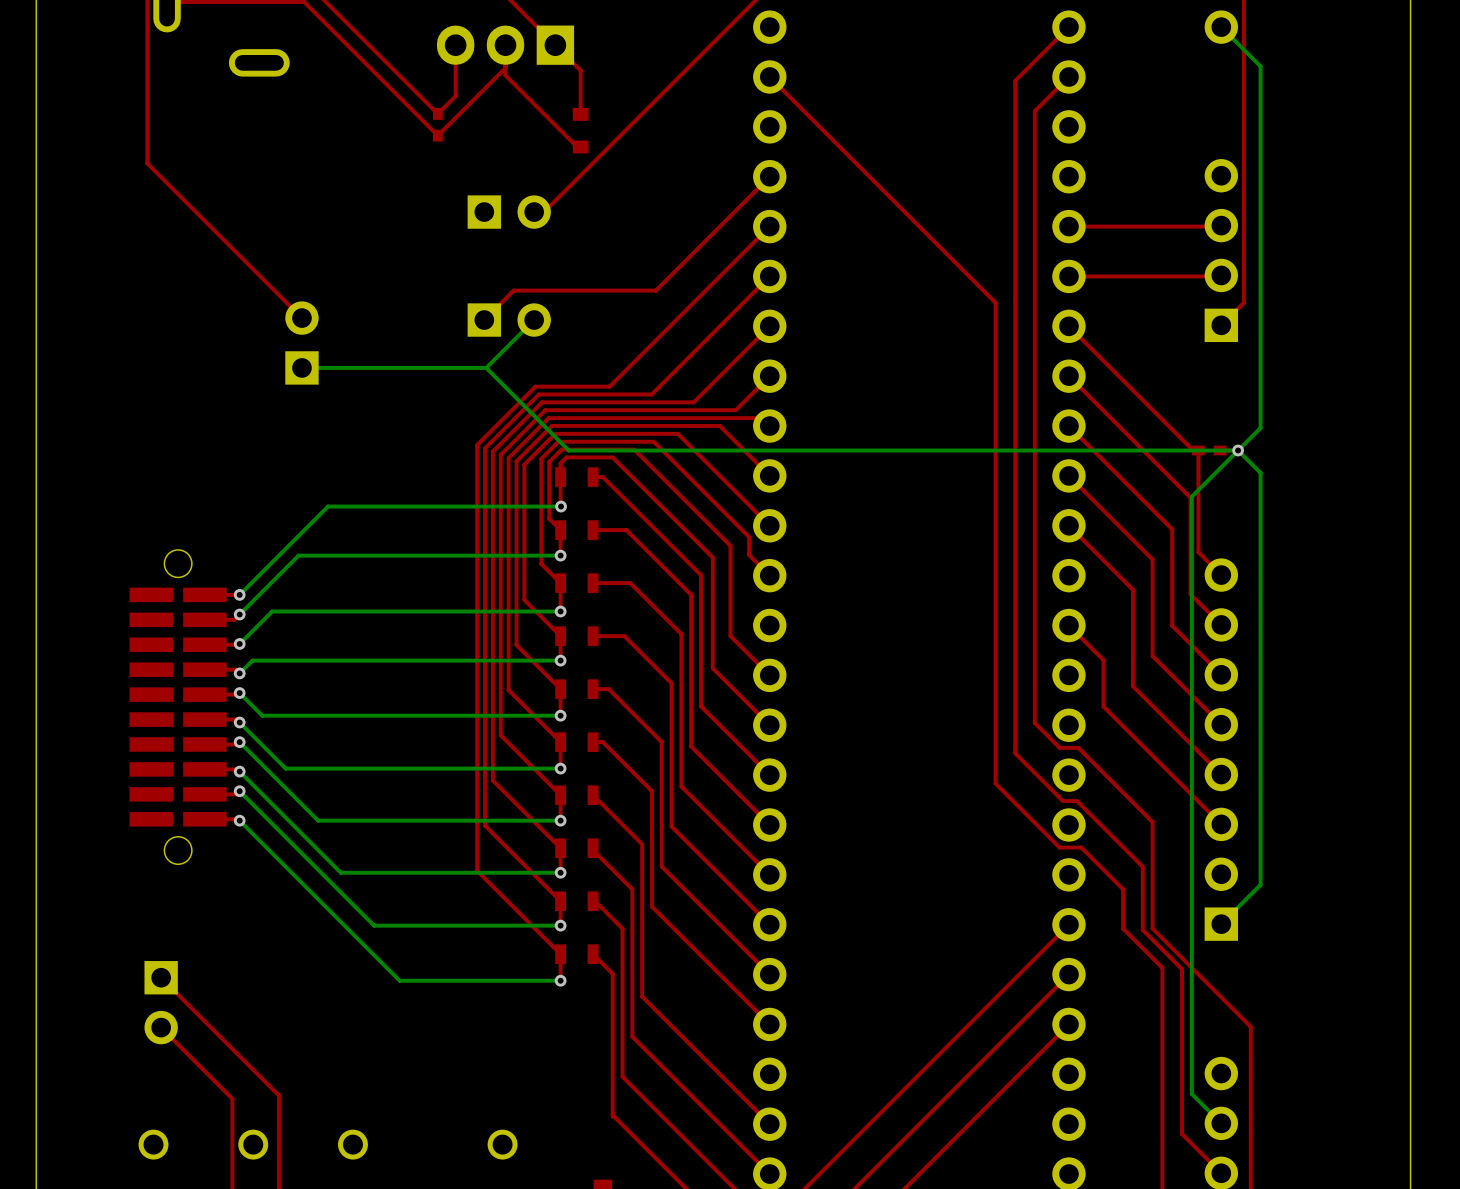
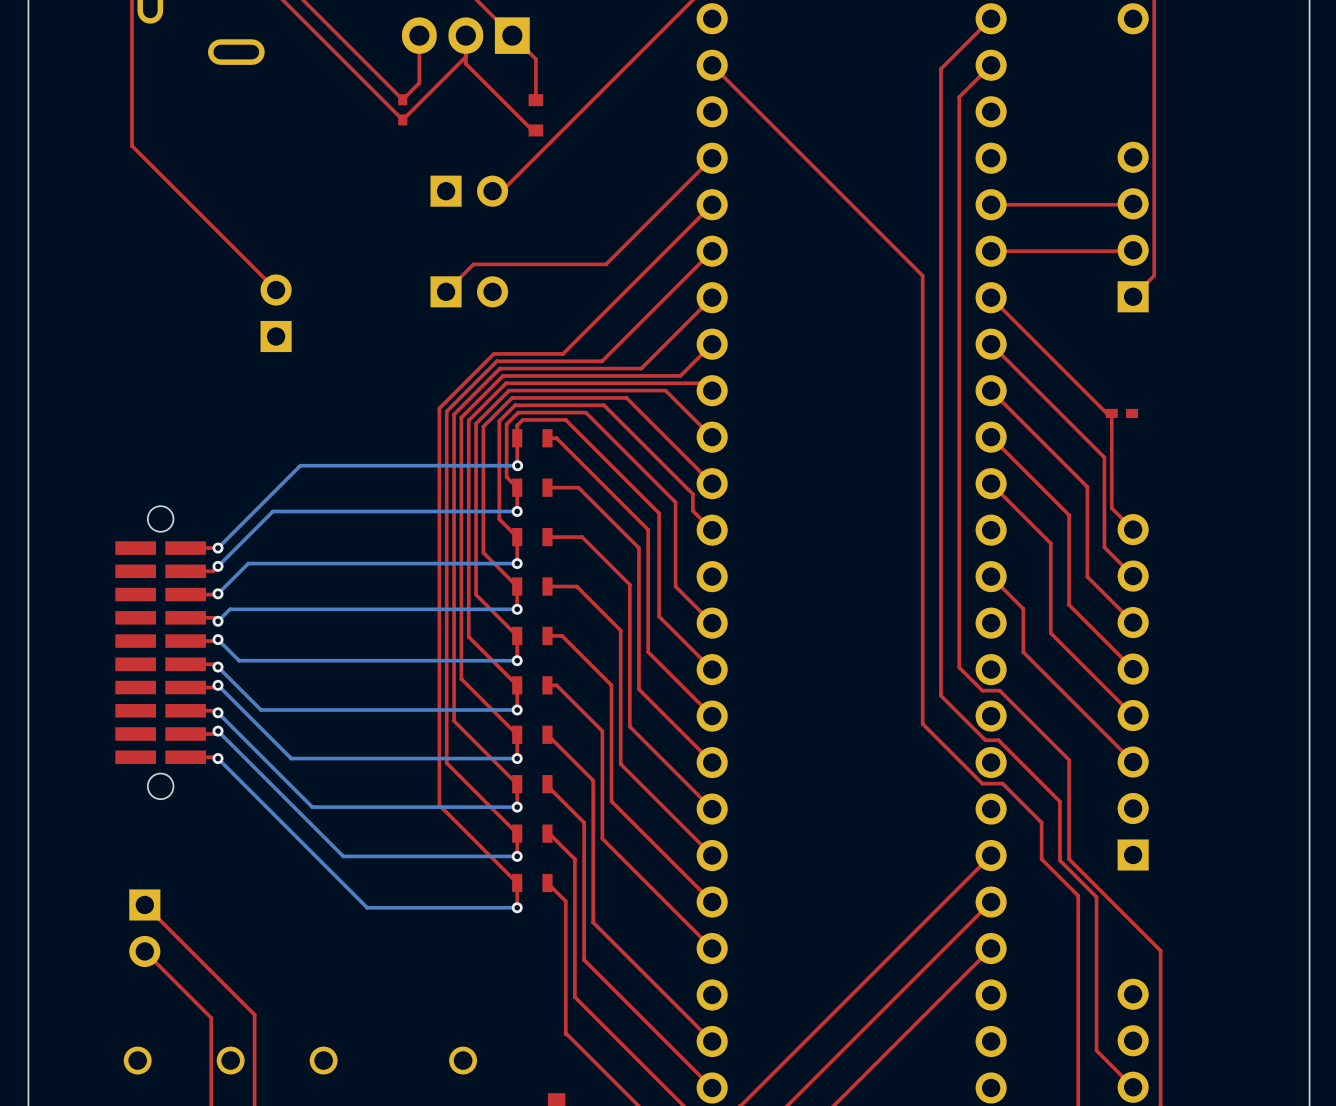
bottom track: (1221, 27) (1260, 66) (1260, 428) (1191, 496) (1191, 1093) (1221, 1123) -> none
bottom track: (534, 320) (486, 367) -> none
bottom track: (486, 367) (301, 367) -> none
bottom track: (486, 367) (568, 450) (1238, 450) (1260, 472) (1260, 884) (1221, 924) -> none
via: (1238, 450) -> none

